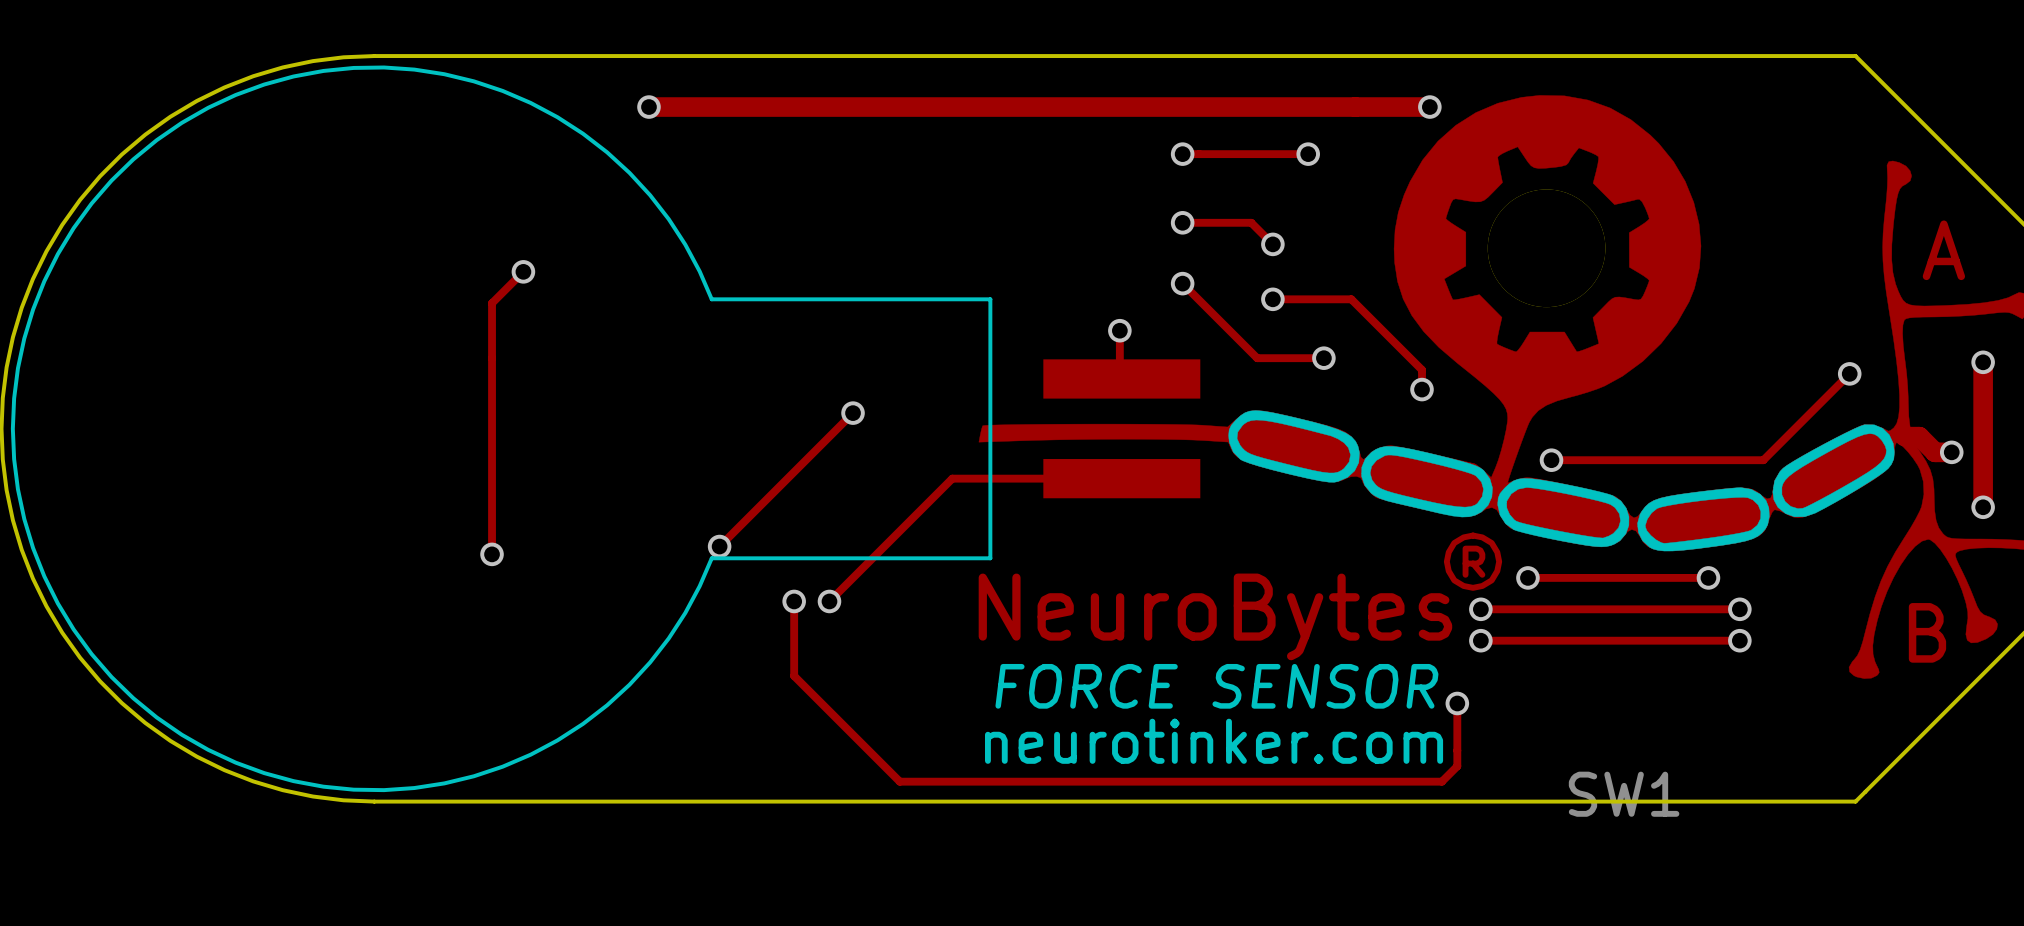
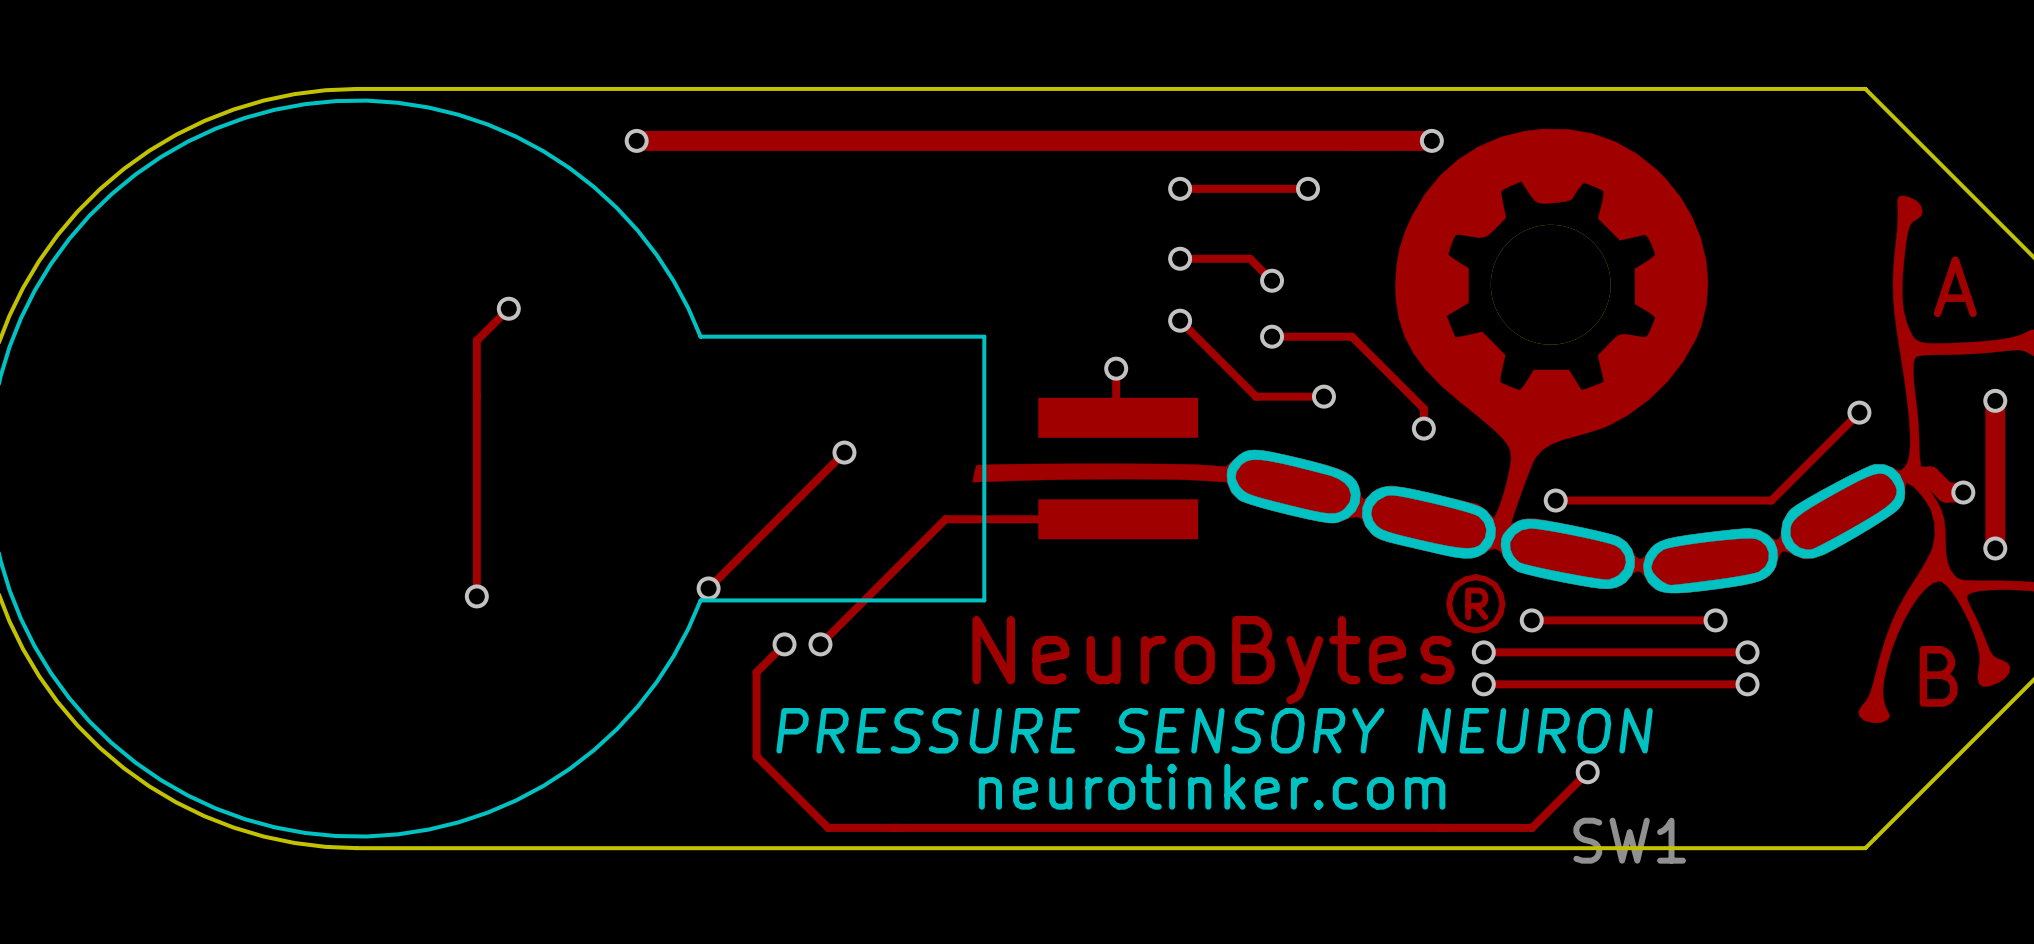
track: (794, 601) (794, 676) (899, 781) -> (784, 644) (756, 672) (756, 756) (828, 827) (892, 827)
text: FORCE SENSOR (1216, 686) -> PRESSURE SENSORY NEURON (1214, 730)
track: (1457, 703) (1457, 766) (1441, 781) -> (1587, 772) (1532, 827) (1444, 827)
via position: (1457, 703) -> (1587, 772)

